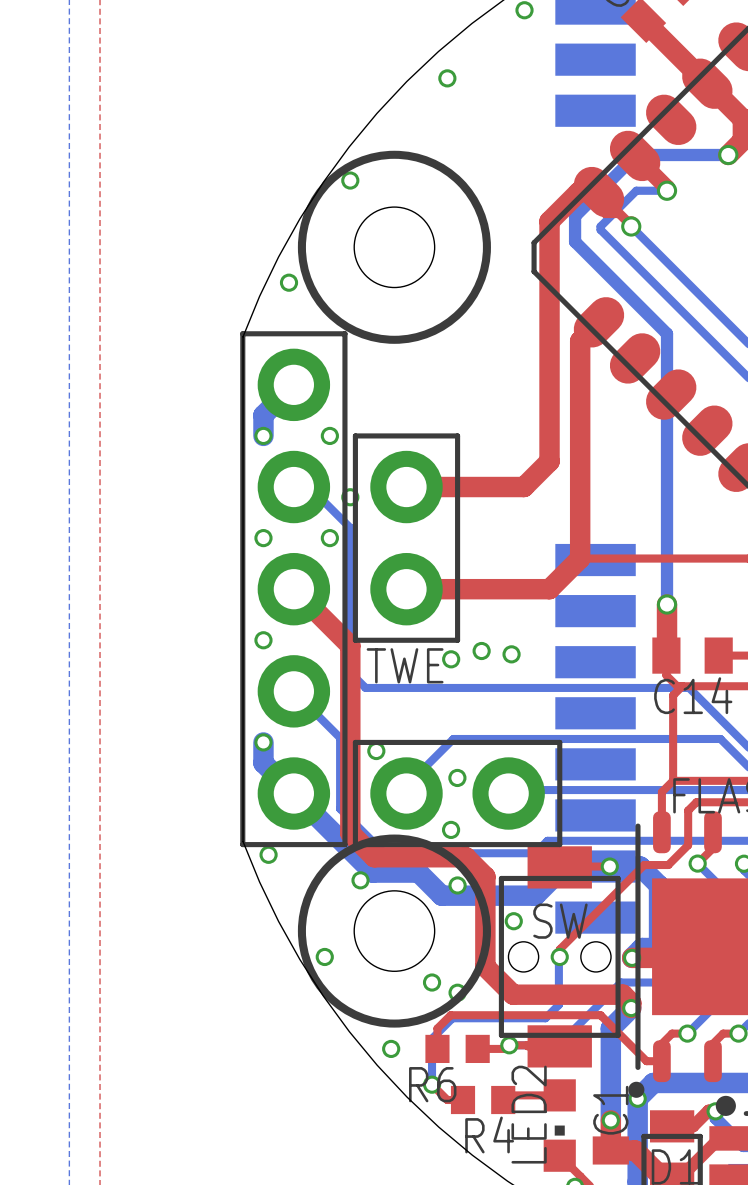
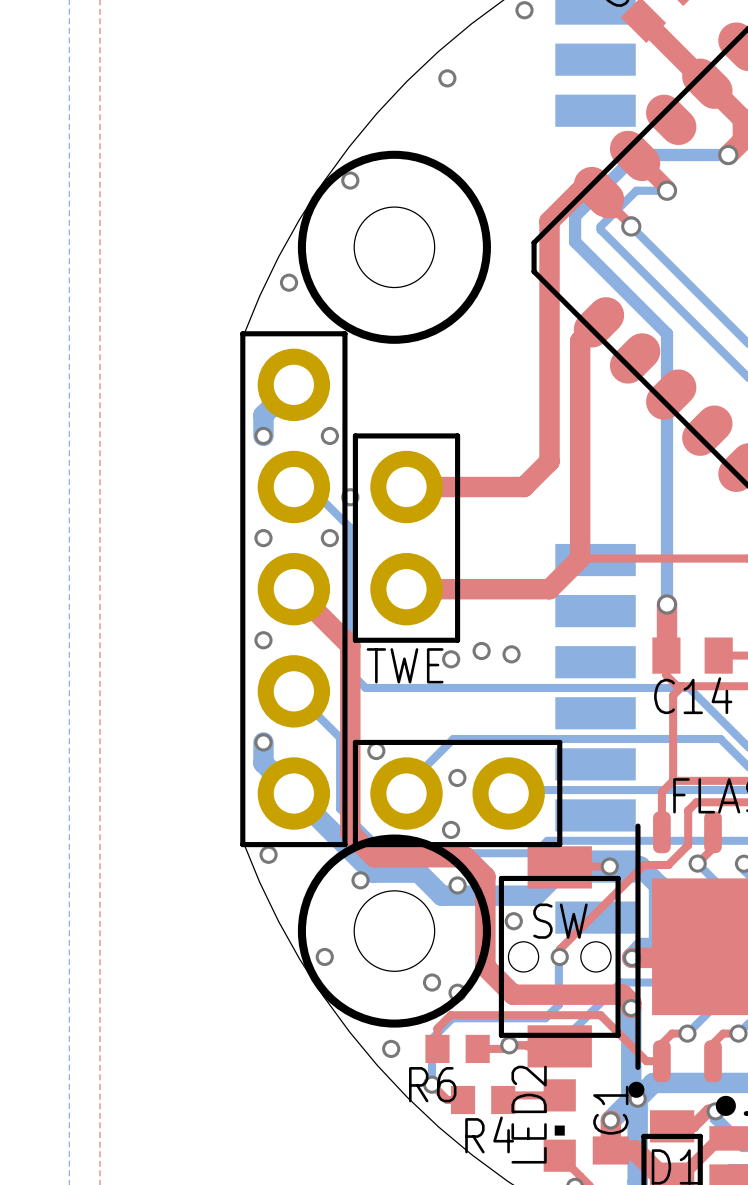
bottom track: (631, 1008) (610, 1028) (610, 1120) -> (631, 1008) (631, 1100) (610, 1120)

